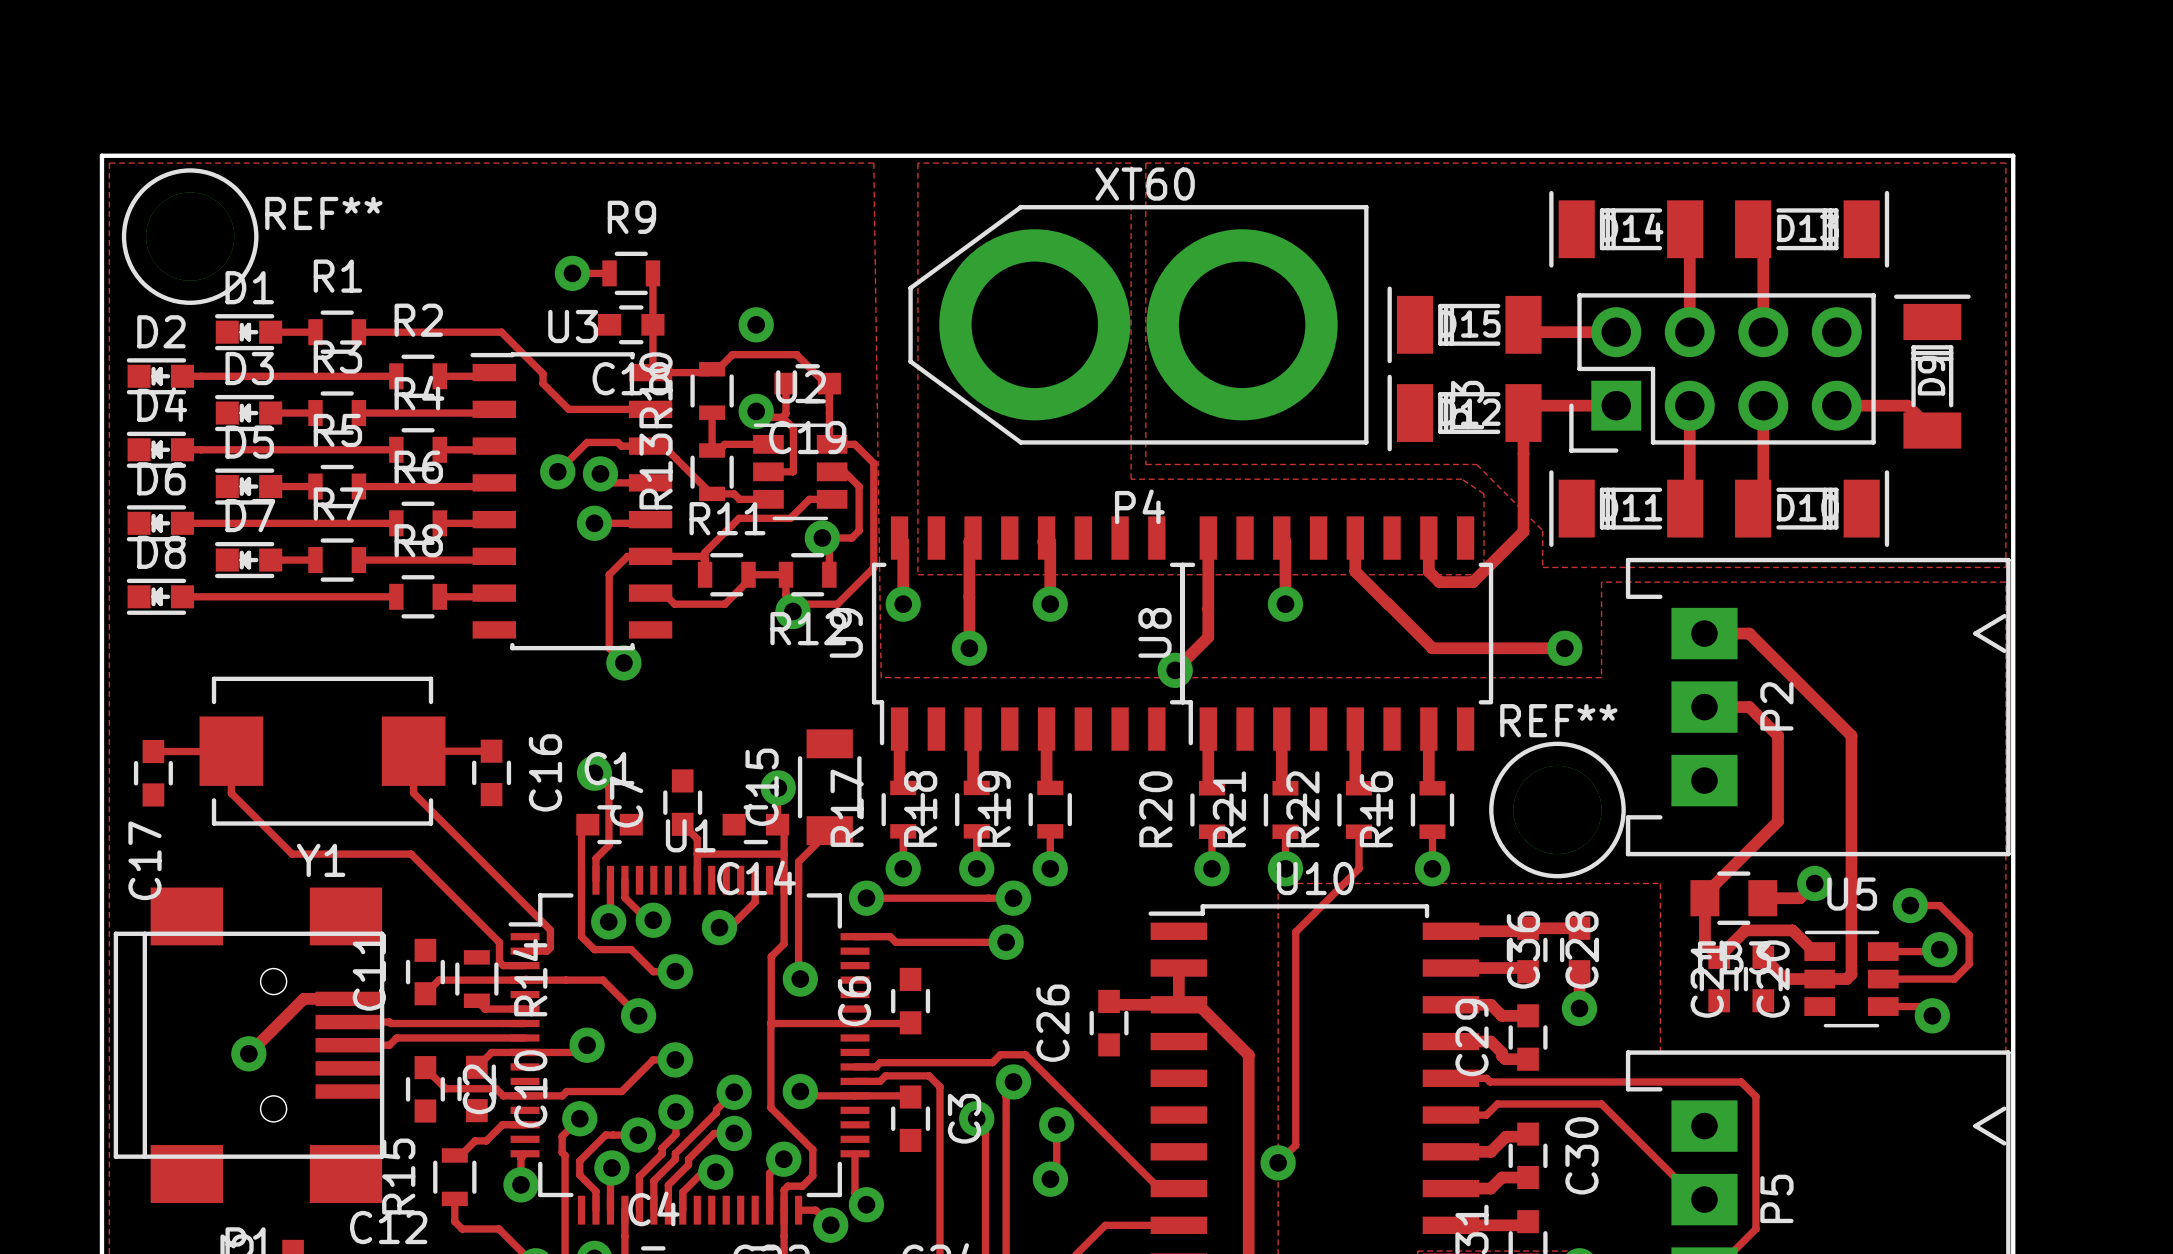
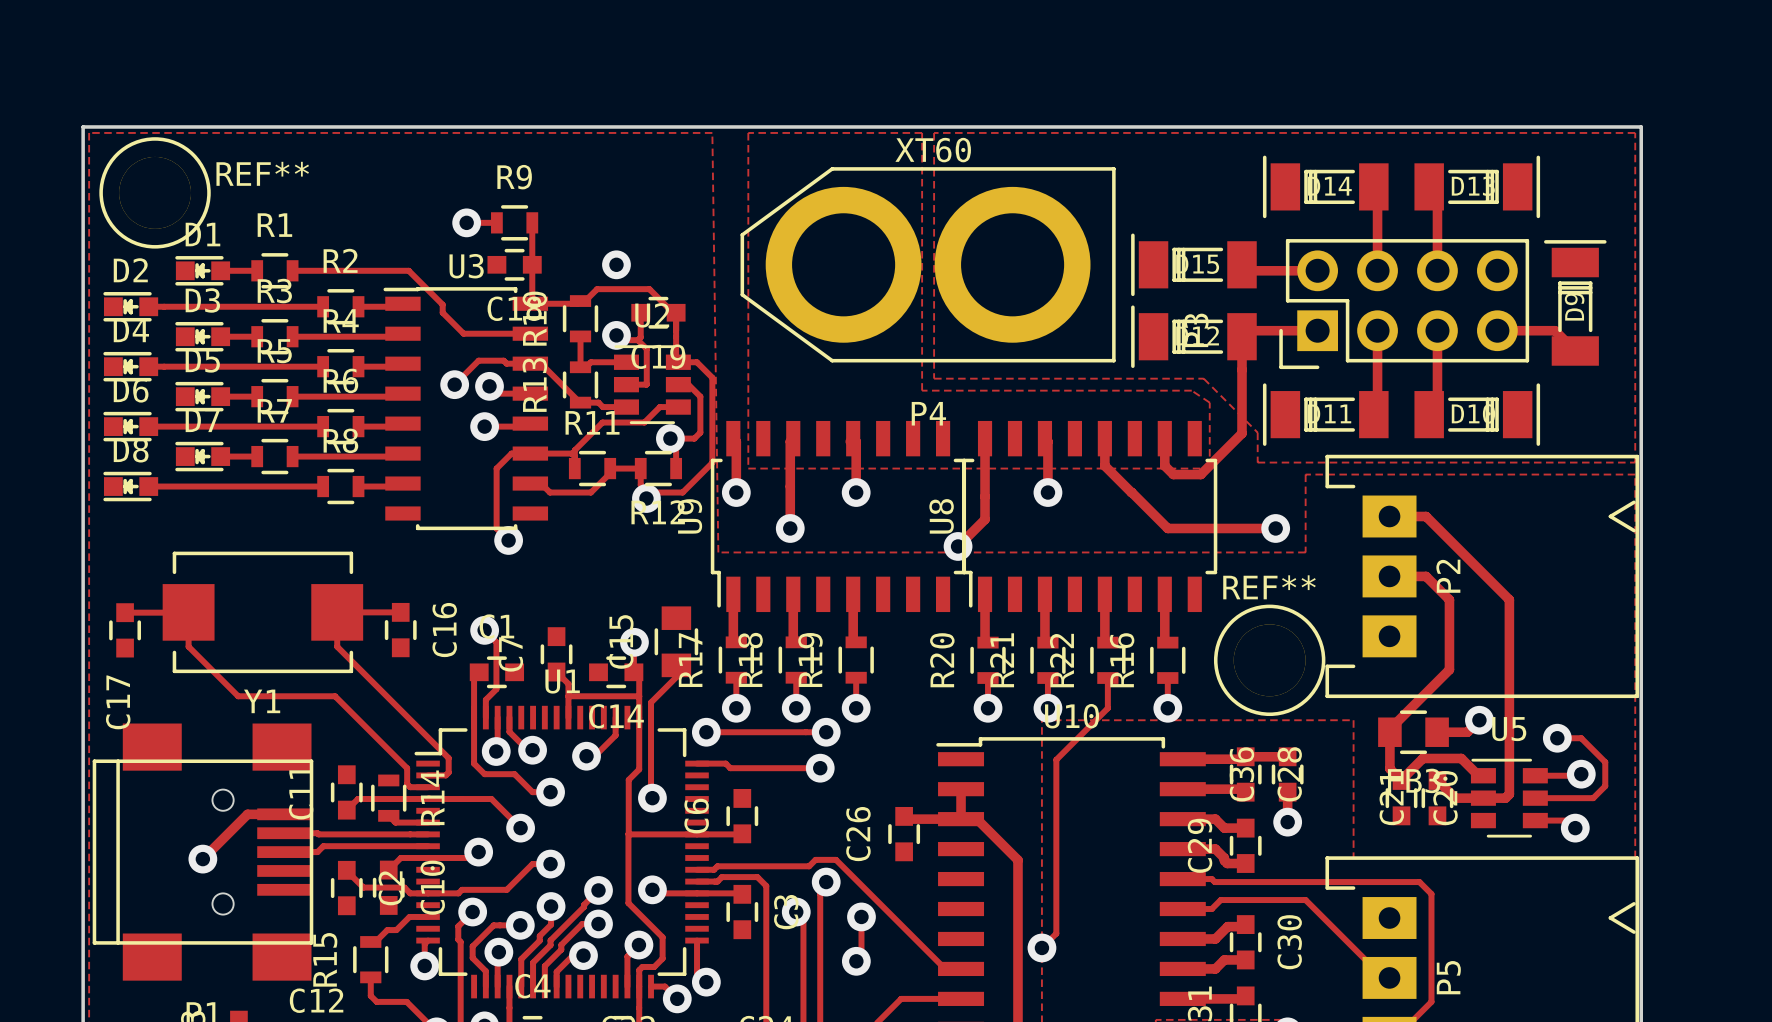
C15 footprint: [797, 729, 862, 846] -> [654, 606, 699, 678]

